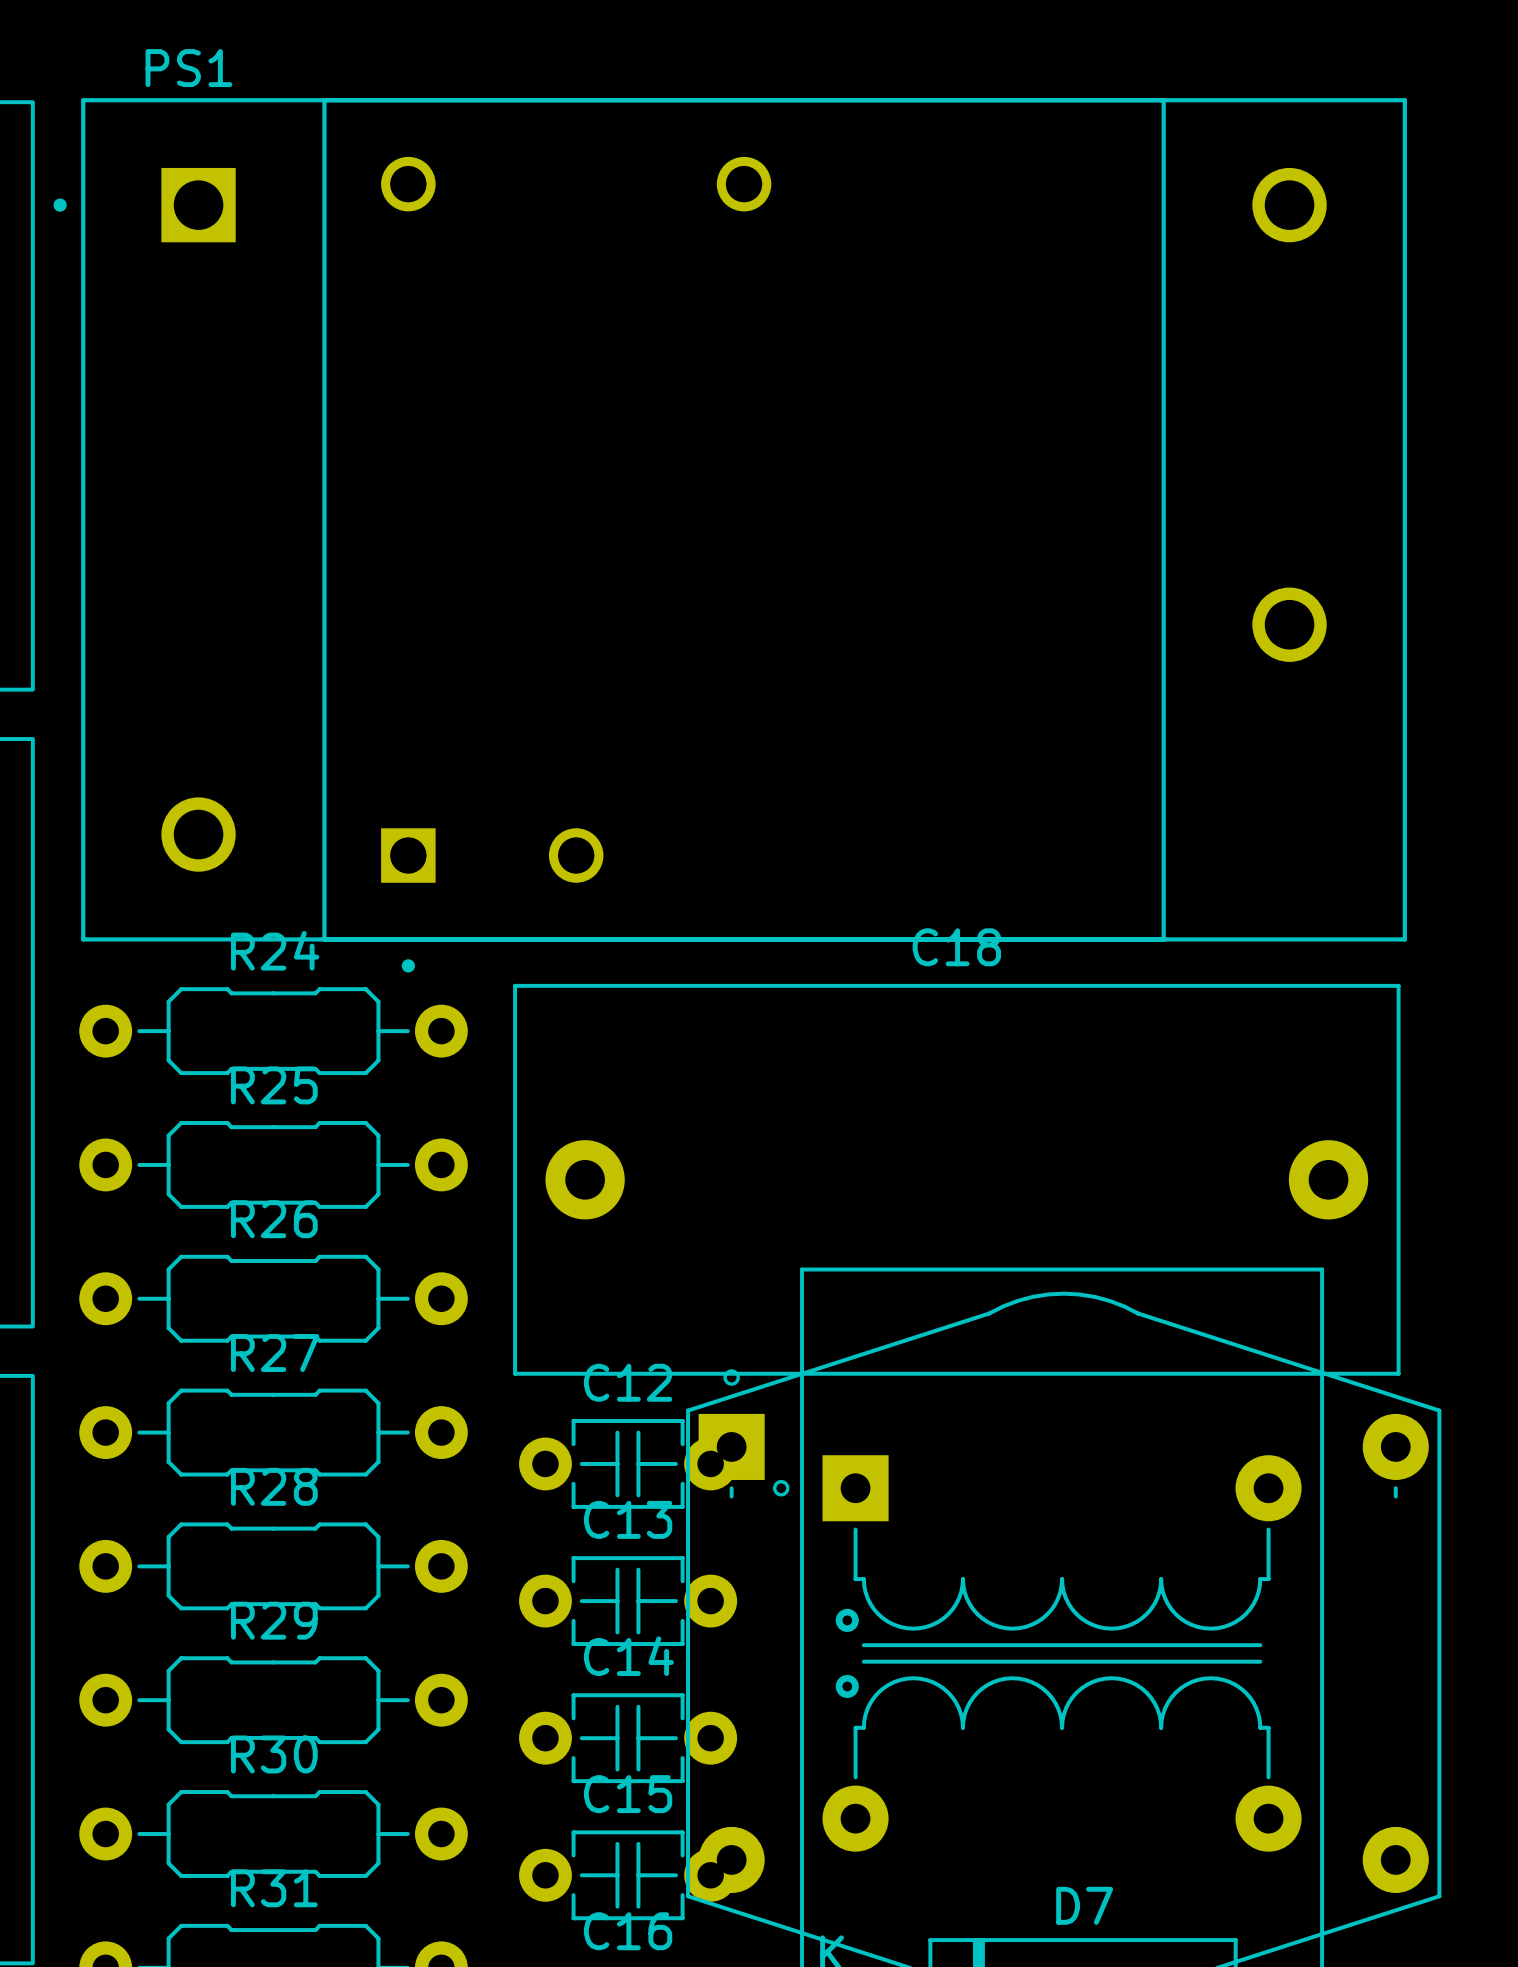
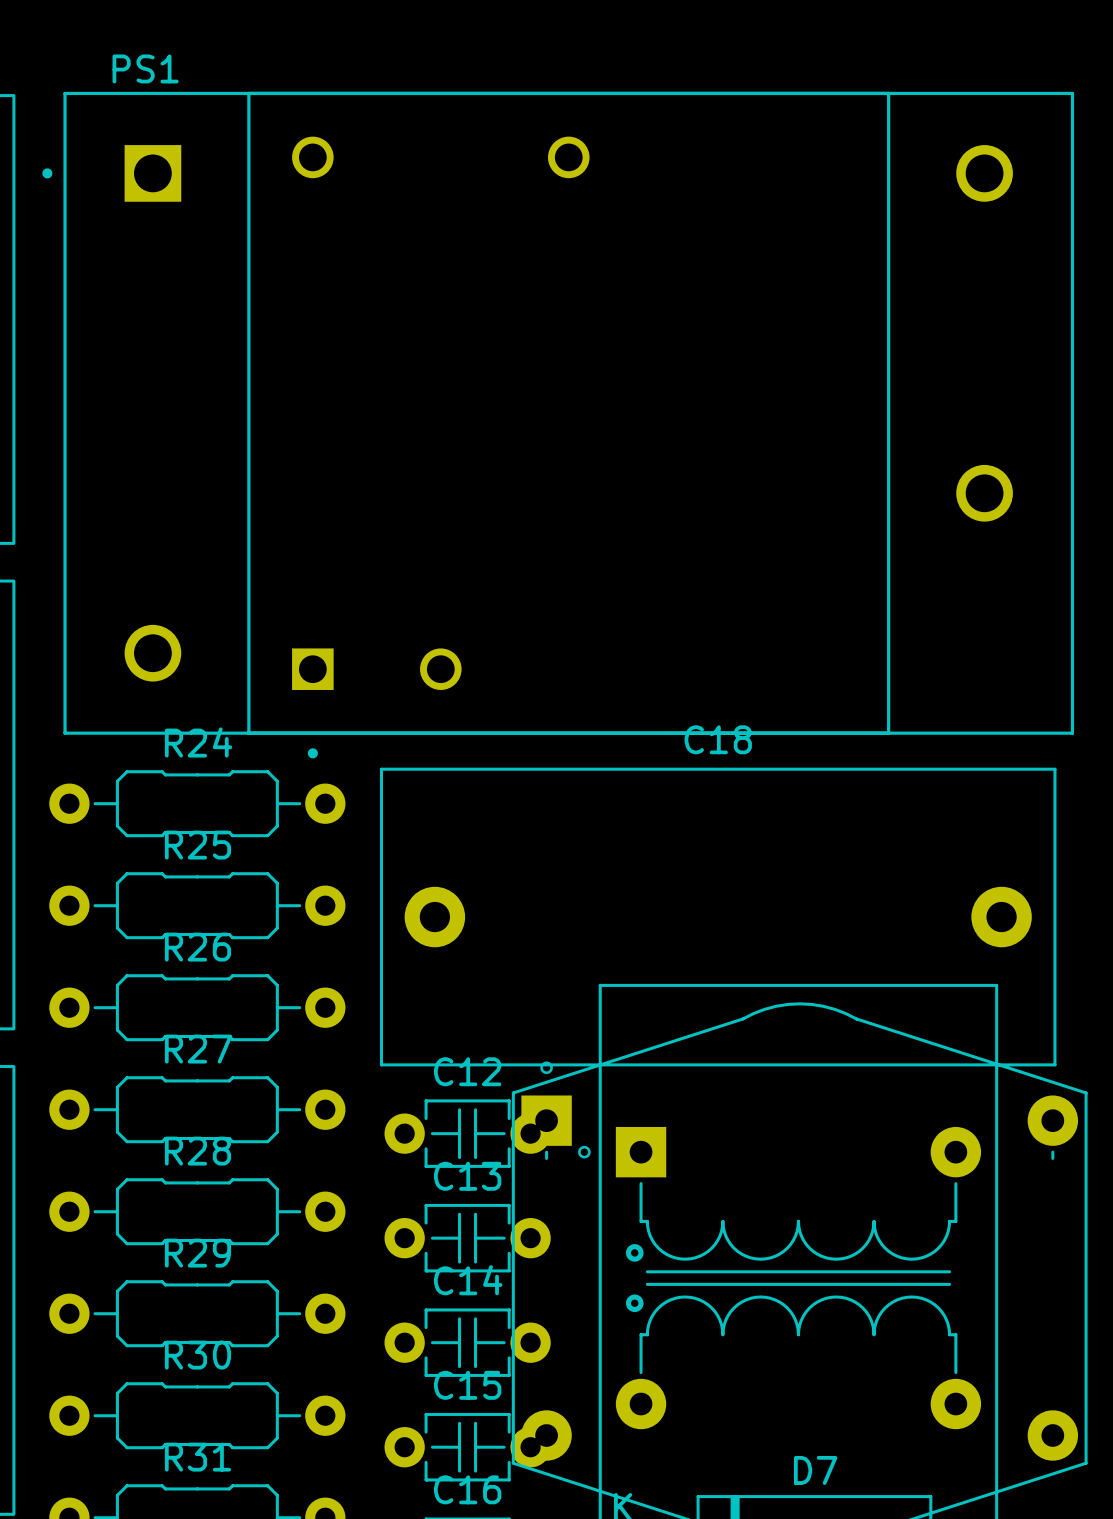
PS1 position: (730, 535) -> (558, 425)

